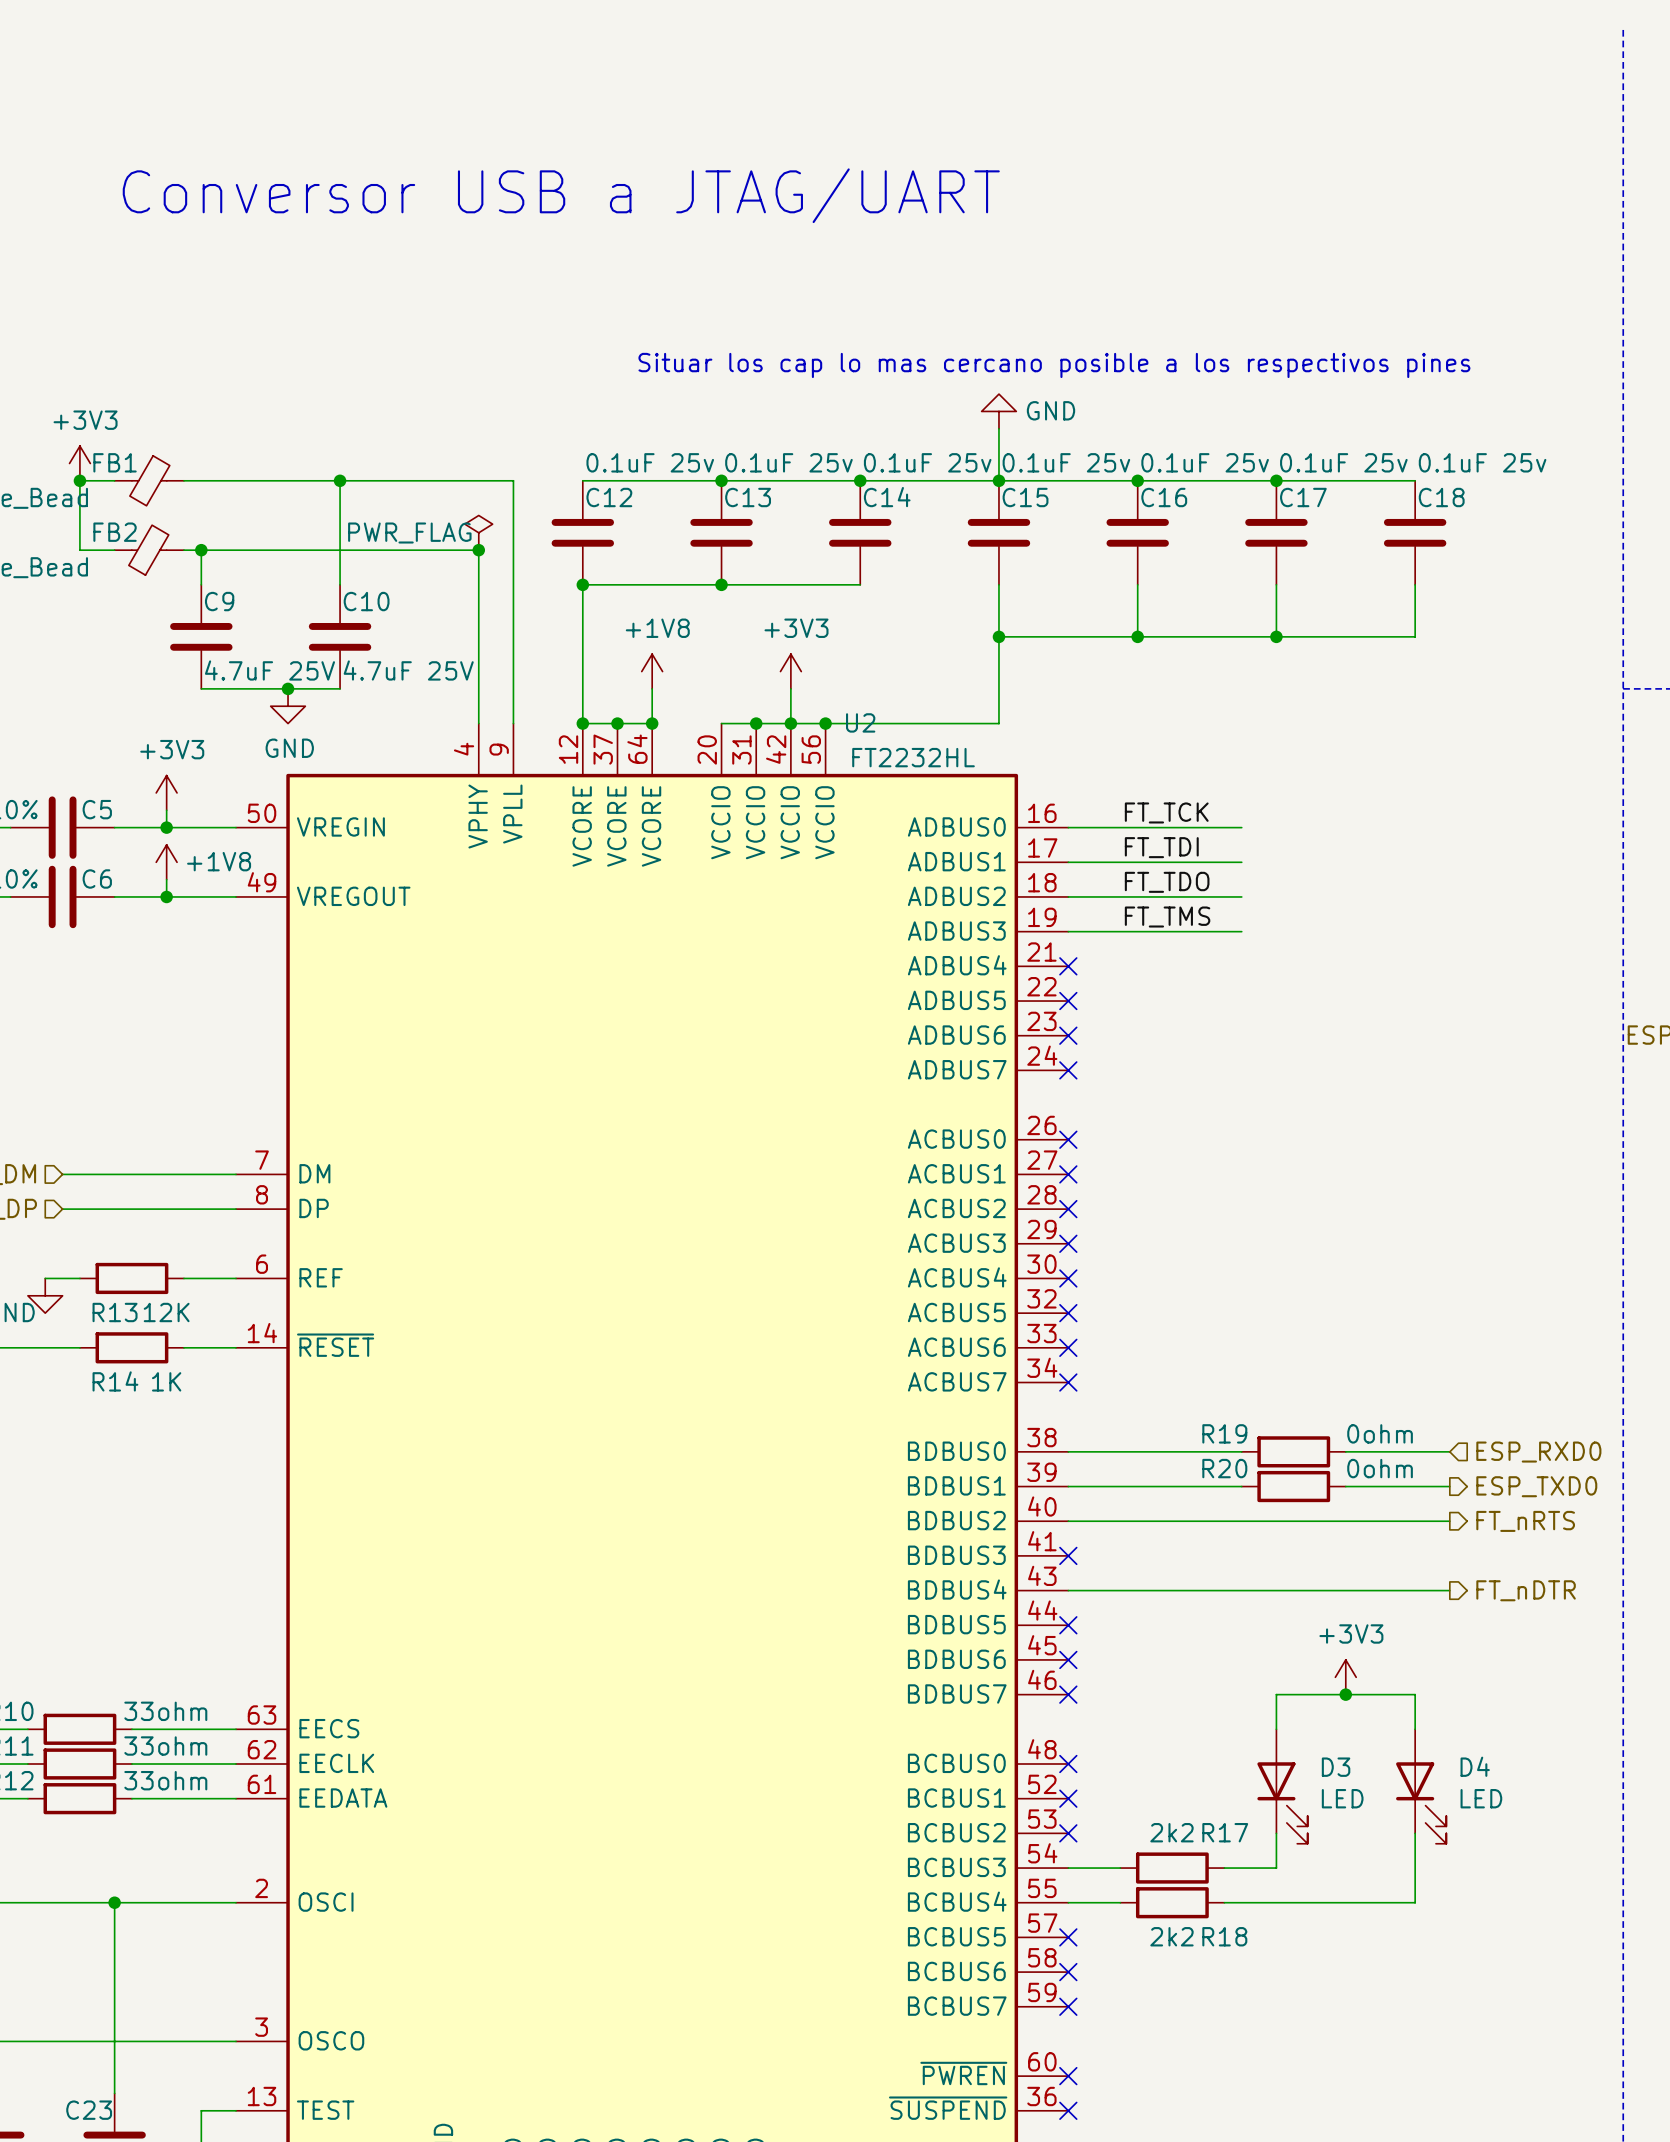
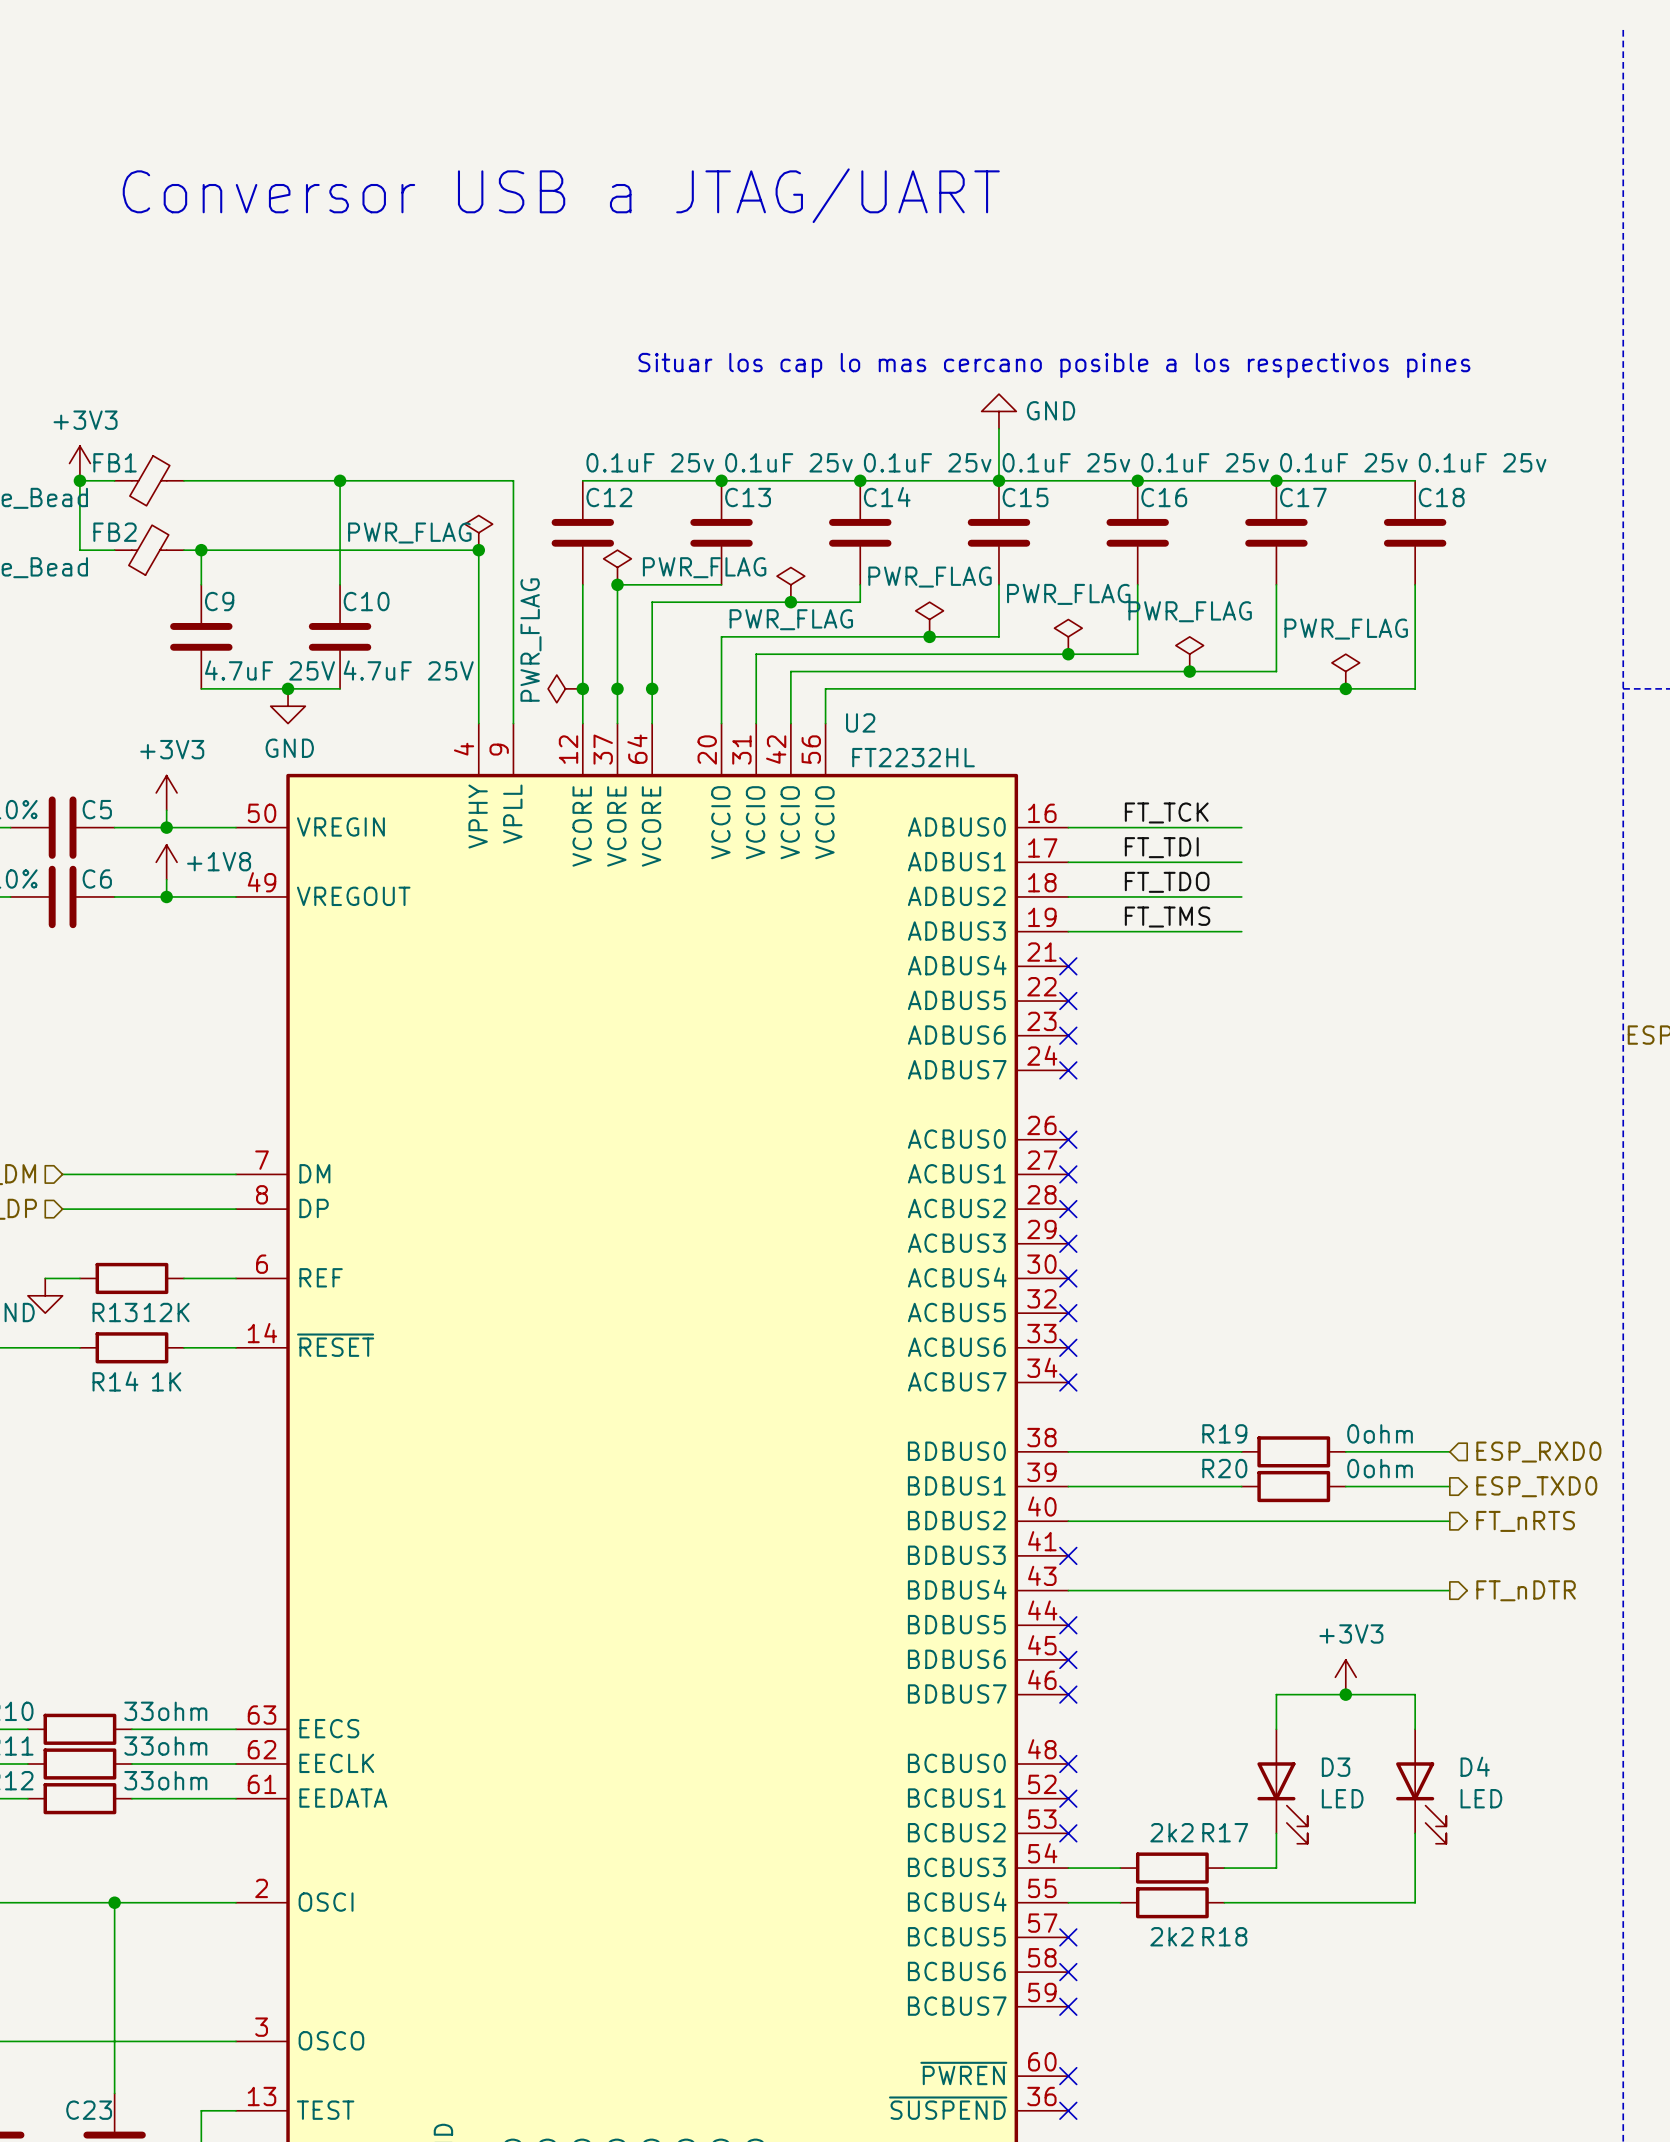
power symbol: none -> PWR_FLAG (617, 567)
wire: (582, 584) (617, 584) -> (617, 723) (617, 584)
junction position: (582, 584) -> (617, 584)
wire: (721, 584) (860, 584) -> (652, 688) (652, 602) (860, 602) (860, 584)
junction: (721, 584) -> none
power symbol: none -> PWR_FLAG (790, 584)
junction: none -> (790, 602)
power symbol: none -> PWR_FLAG (929, 619)
junction: none -> (929, 636)
wire: none -> (998, 636) (721, 636) (721, 723)
junction: (998, 636) -> none
power symbol: none -> PWR_FLAG (1068, 636)
wire: none -> (1137, 636) (1137, 654) (756, 654) (756, 723)
junction: (1137, 636) -> none
wire: none -> (1276, 636) (1276, 671) (790, 671) (790, 688)
junction: (1276, 636) -> none
wire: (1415, 636) (998, 636) (998, 723) (721, 723) -> (1415, 636) (1415, 688) (825, 688) (825, 723)
junction: none -> (1068, 654)
power symbol: none -> PWR_FLAG (1189, 654)
power symbol: +1V8 (652, 671) -> none
power symbol: +3V3 (790, 671) -> none
junction: none -> (1189, 671)
power symbol: none -> PWR_FLAG (1345, 671)
power symbol: none -> PWR_FLAG (565, 688)
junction: none -> (582, 688)
junction: none -> (617, 688)
junction: none -> (652, 688)
junction: none -> (1345, 688)
wire: (582, 723) (652, 723) -> none
junction: (582, 723) -> none
junction: (617, 723) -> none
junction: (652, 723) -> none
junction: (756, 723) -> none
junction: (790, 723) -> none
junction: (825, 723) -> none

